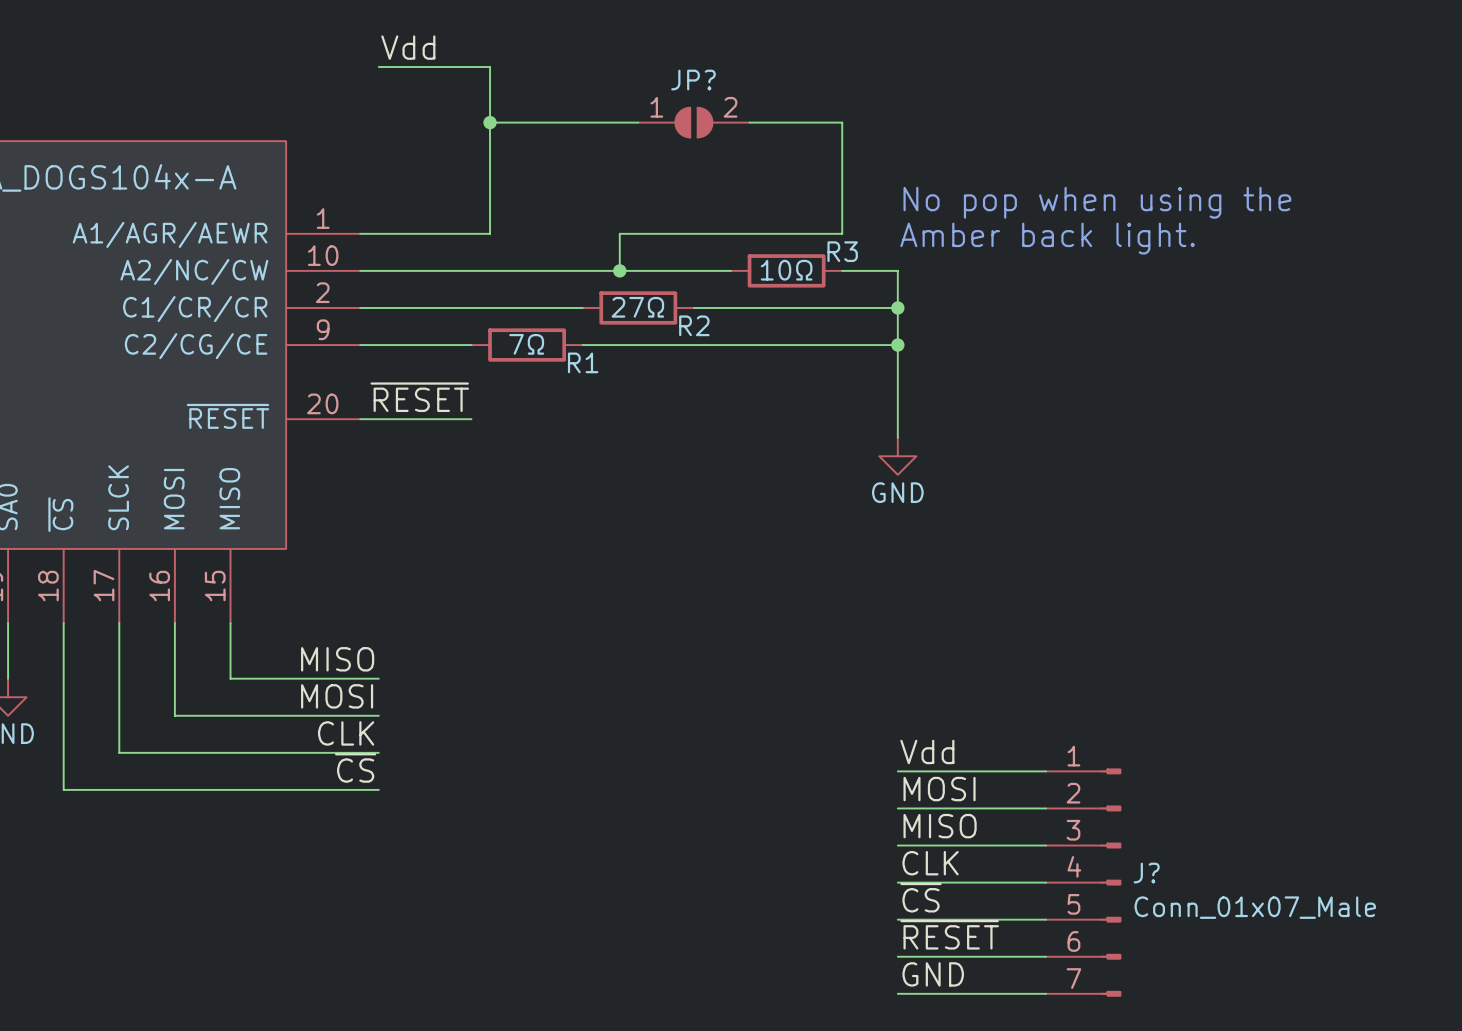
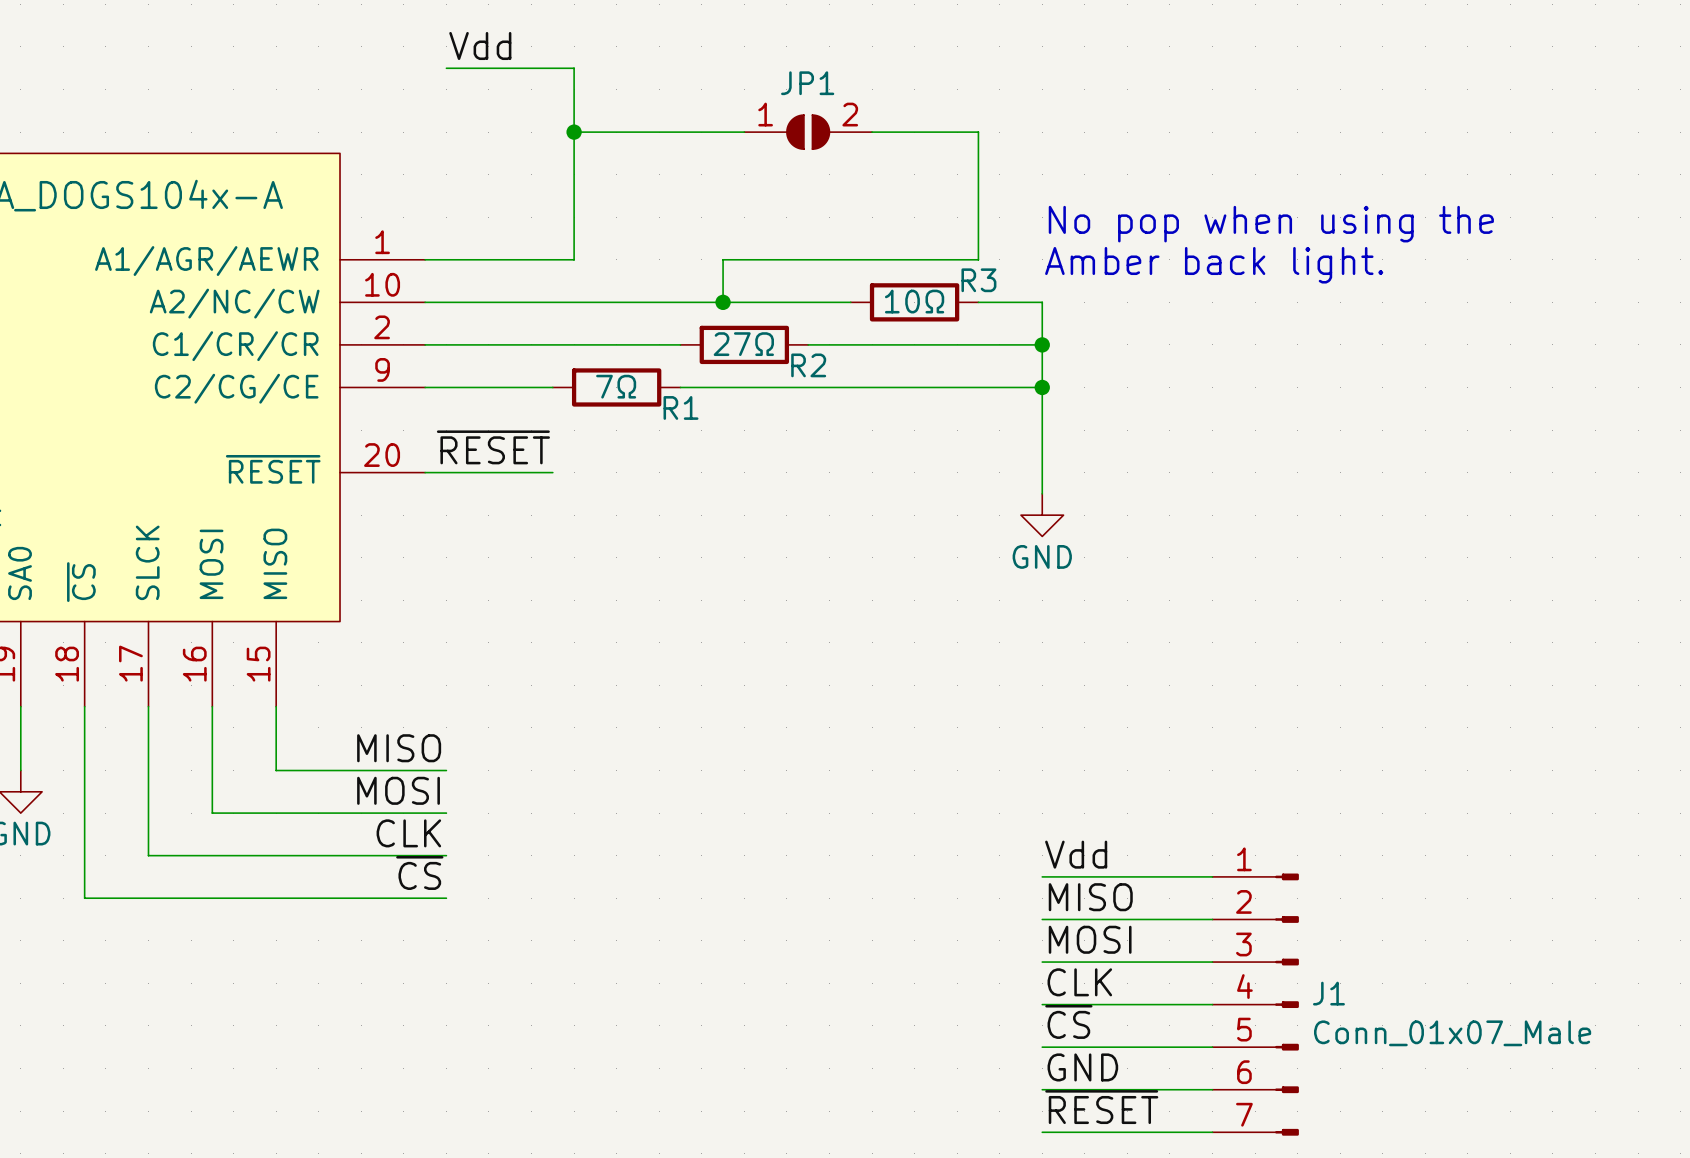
JP? name: JP? (693, 80) -> JP1 (807, 83)
label: MOSI (939, 789) -> MISO (1090, 897)
label: MISO (940, 826) -> MOSI (1090, 939)
J? name: J? (1146, 873) -> J1 (1328, 993)
label: ~{RESET} (949, 934) -> GND (1082, 1067)
label: GND (933, 974) -> ~{RESET} (1101, 1107)

